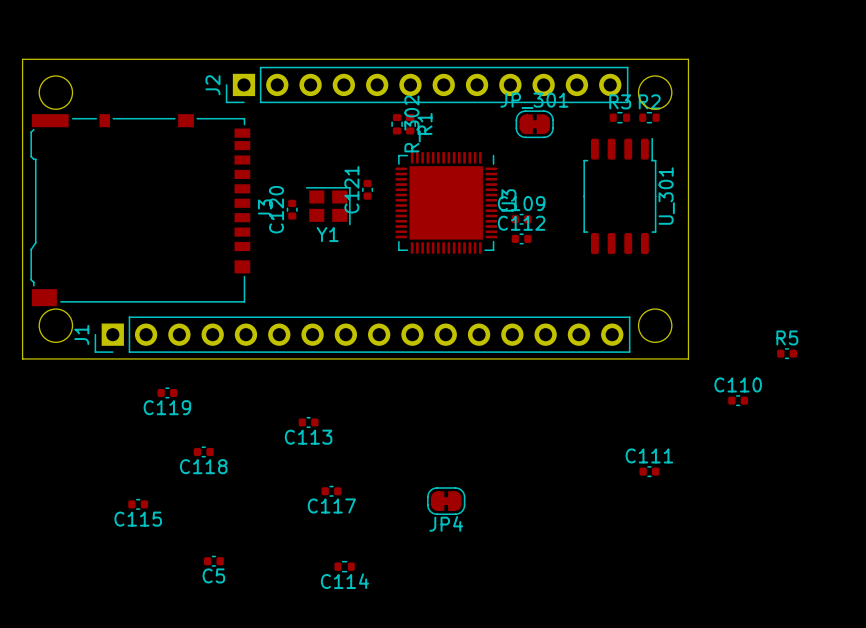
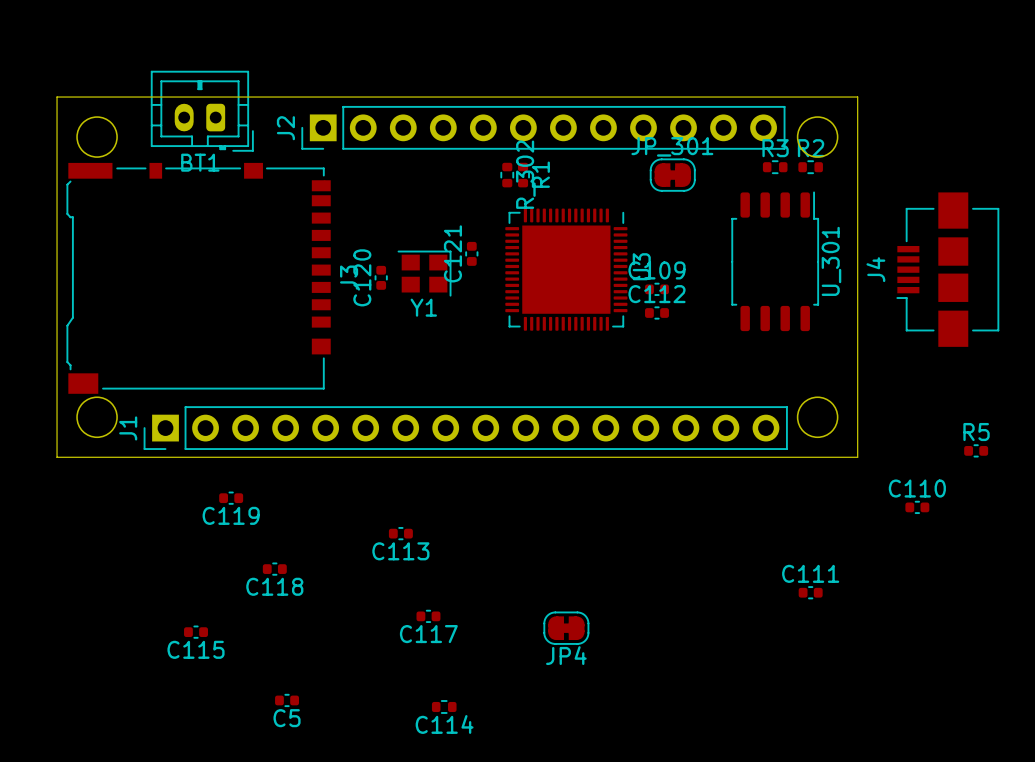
BT1: none -> (202, 111)
J4: none -> (947, 269)

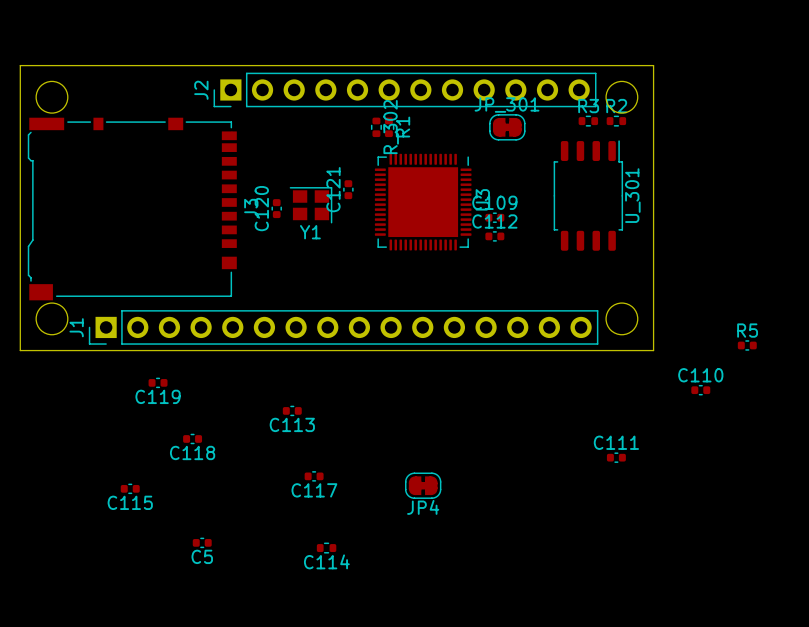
BT1: (202, 111) -> none
J4: (947, 269) -> none

